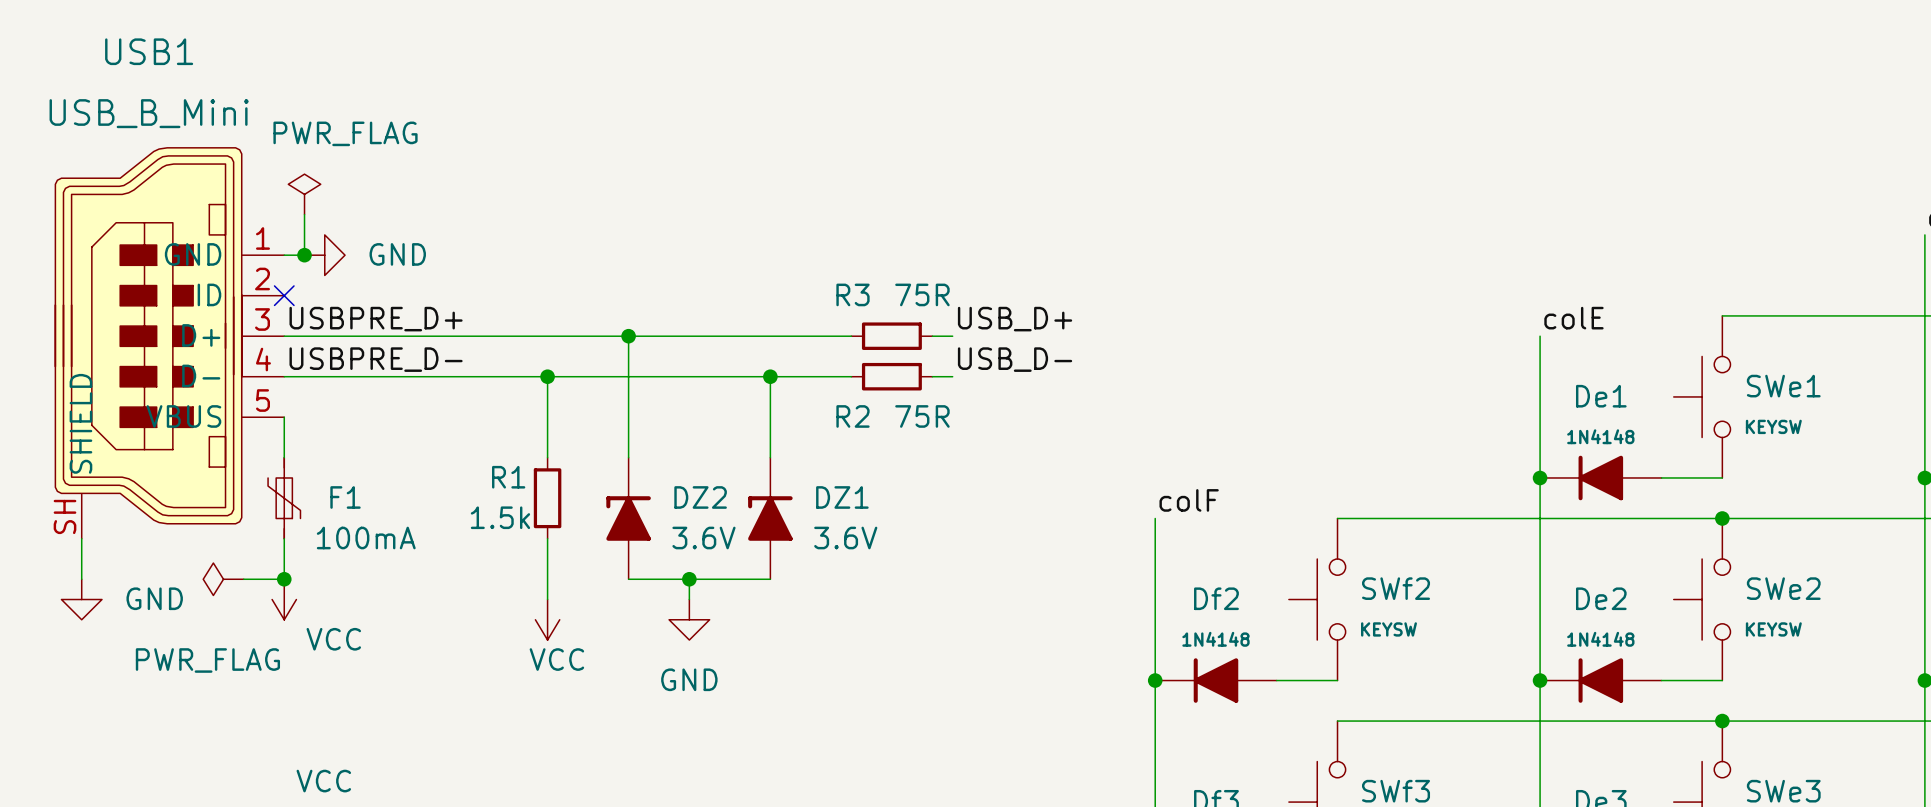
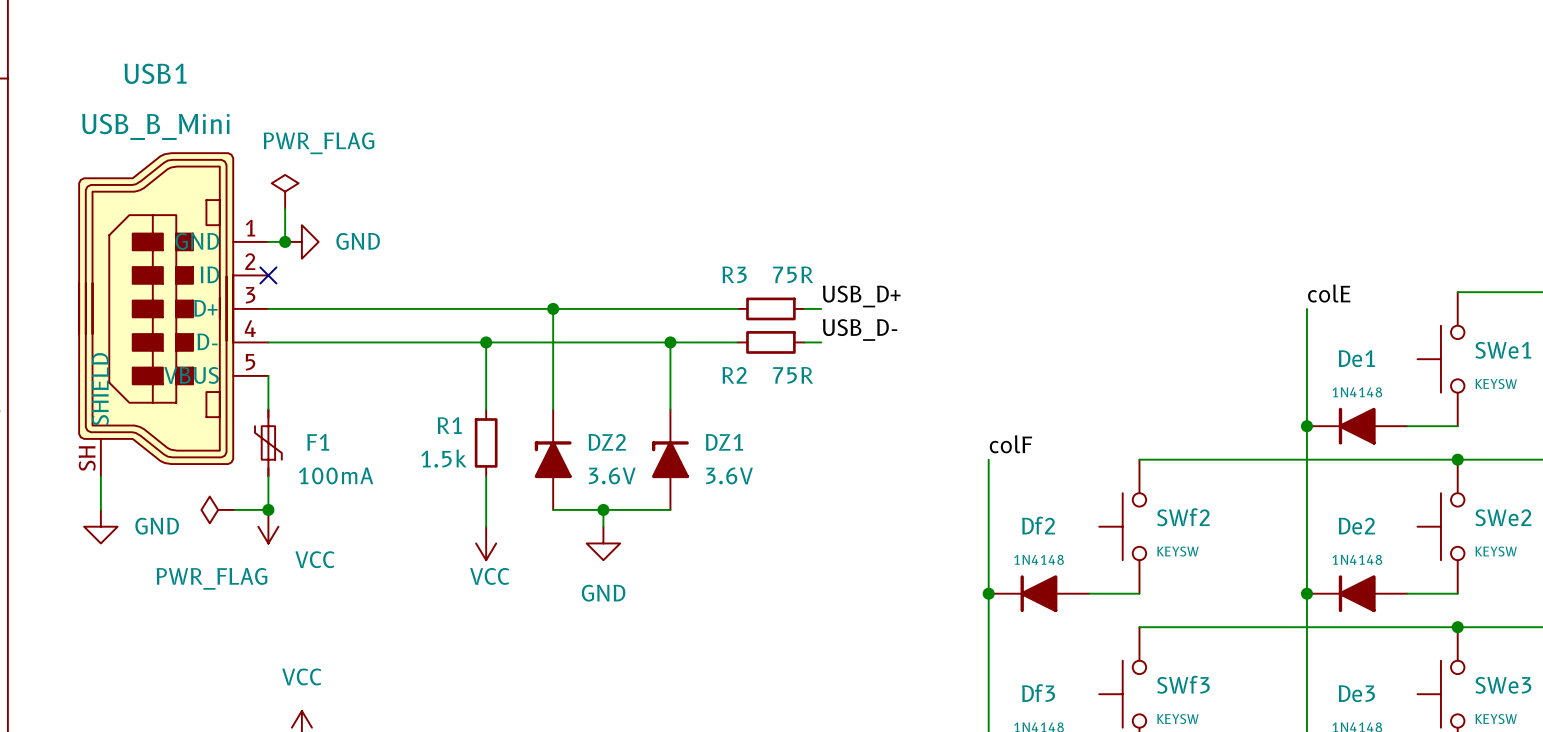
label: USBPRE_D+ (376, 319) -> none
label: USBPRE_D- (376, 359) -> none

